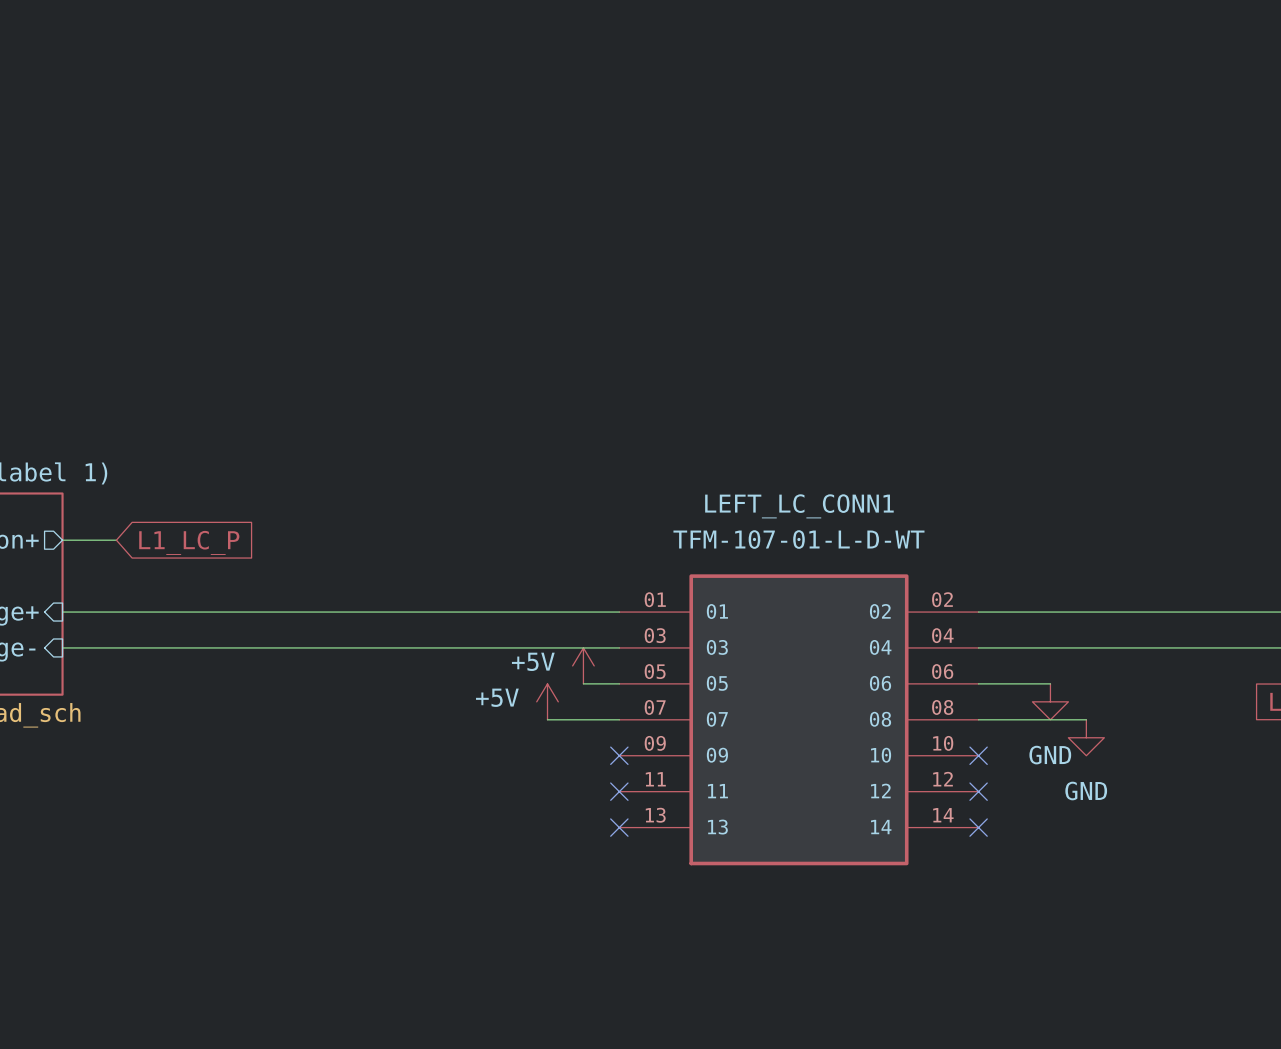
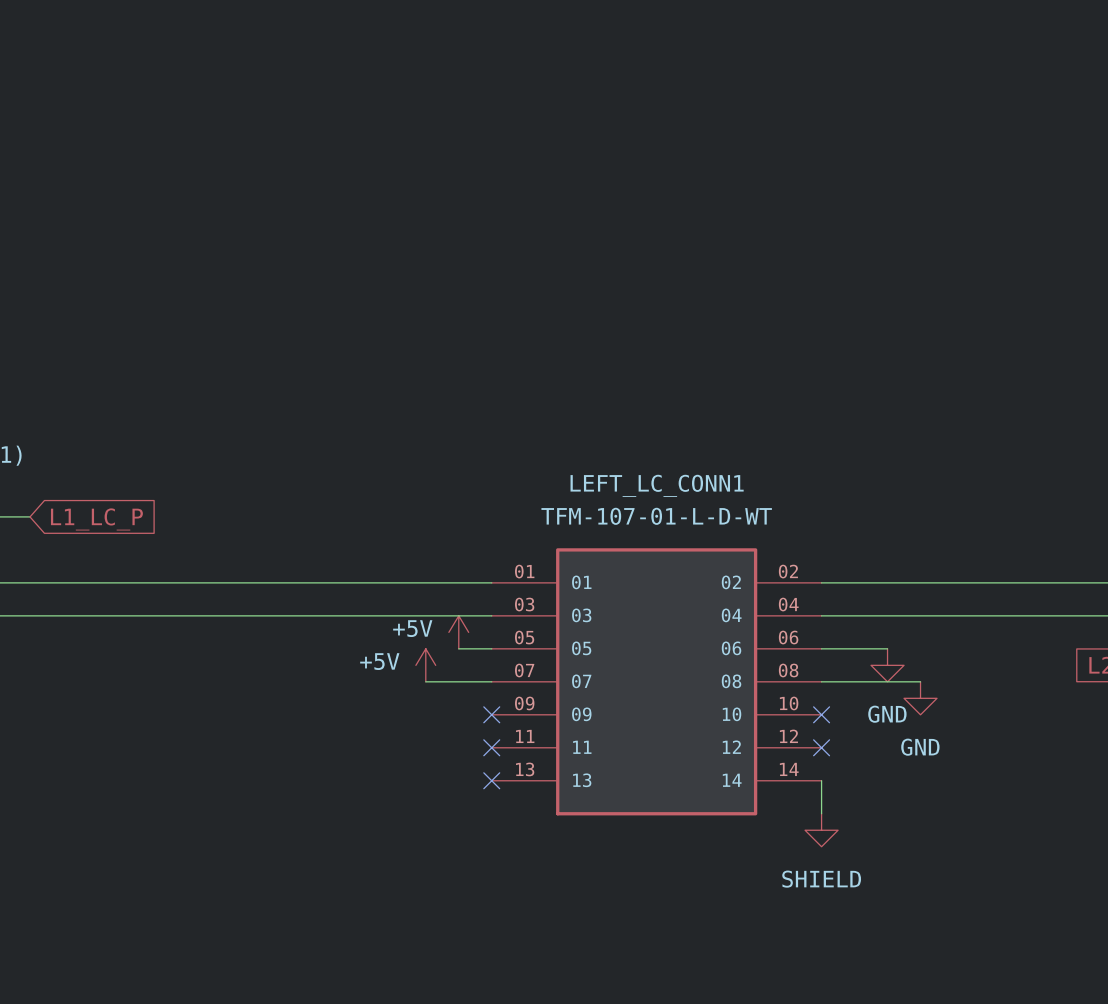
wire: none -> (821, 780) (821, 813)
no-connect mark: (978, 827) -> none
power symbol: none -> SHIELD (821, 830)

